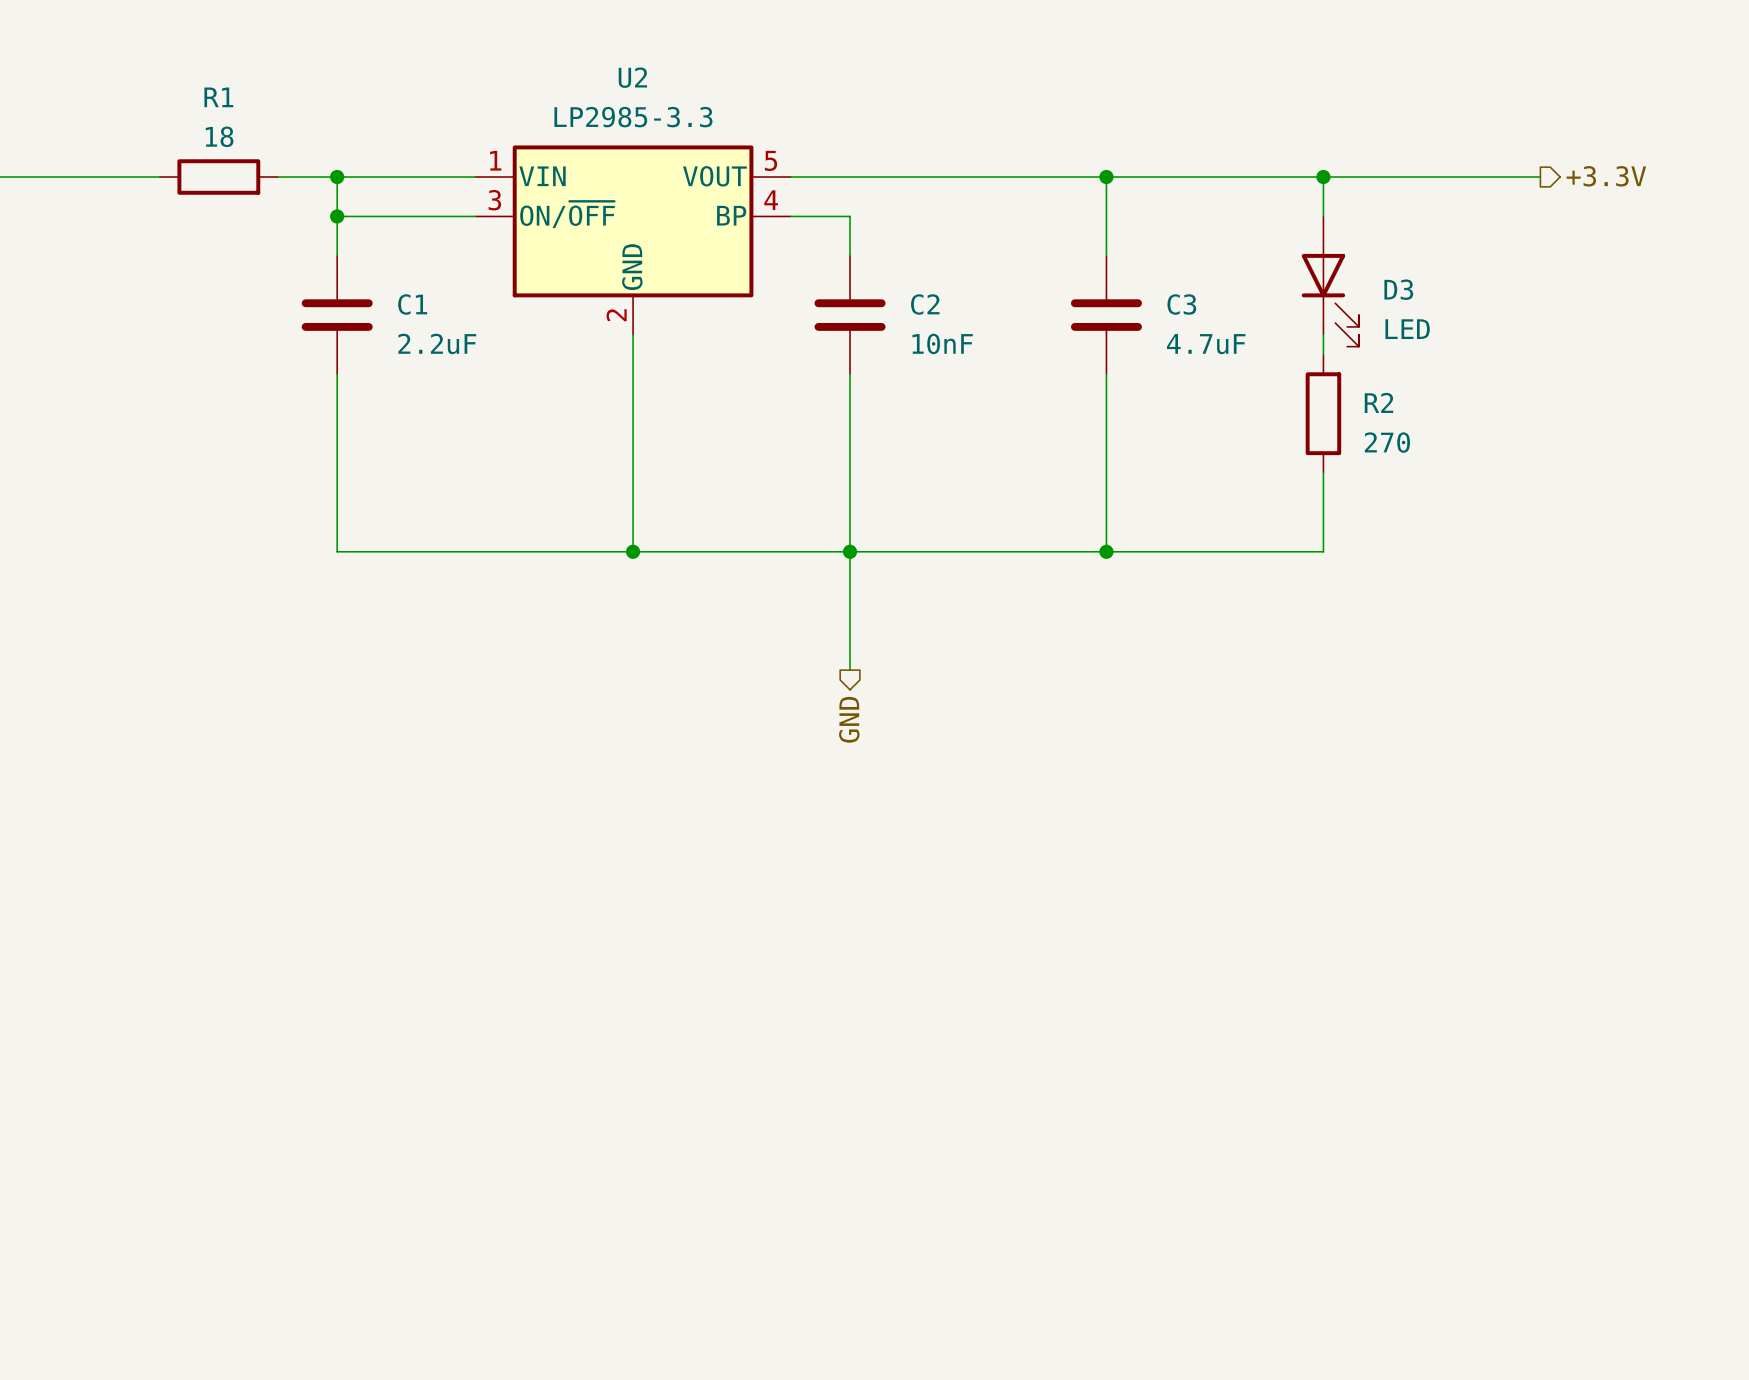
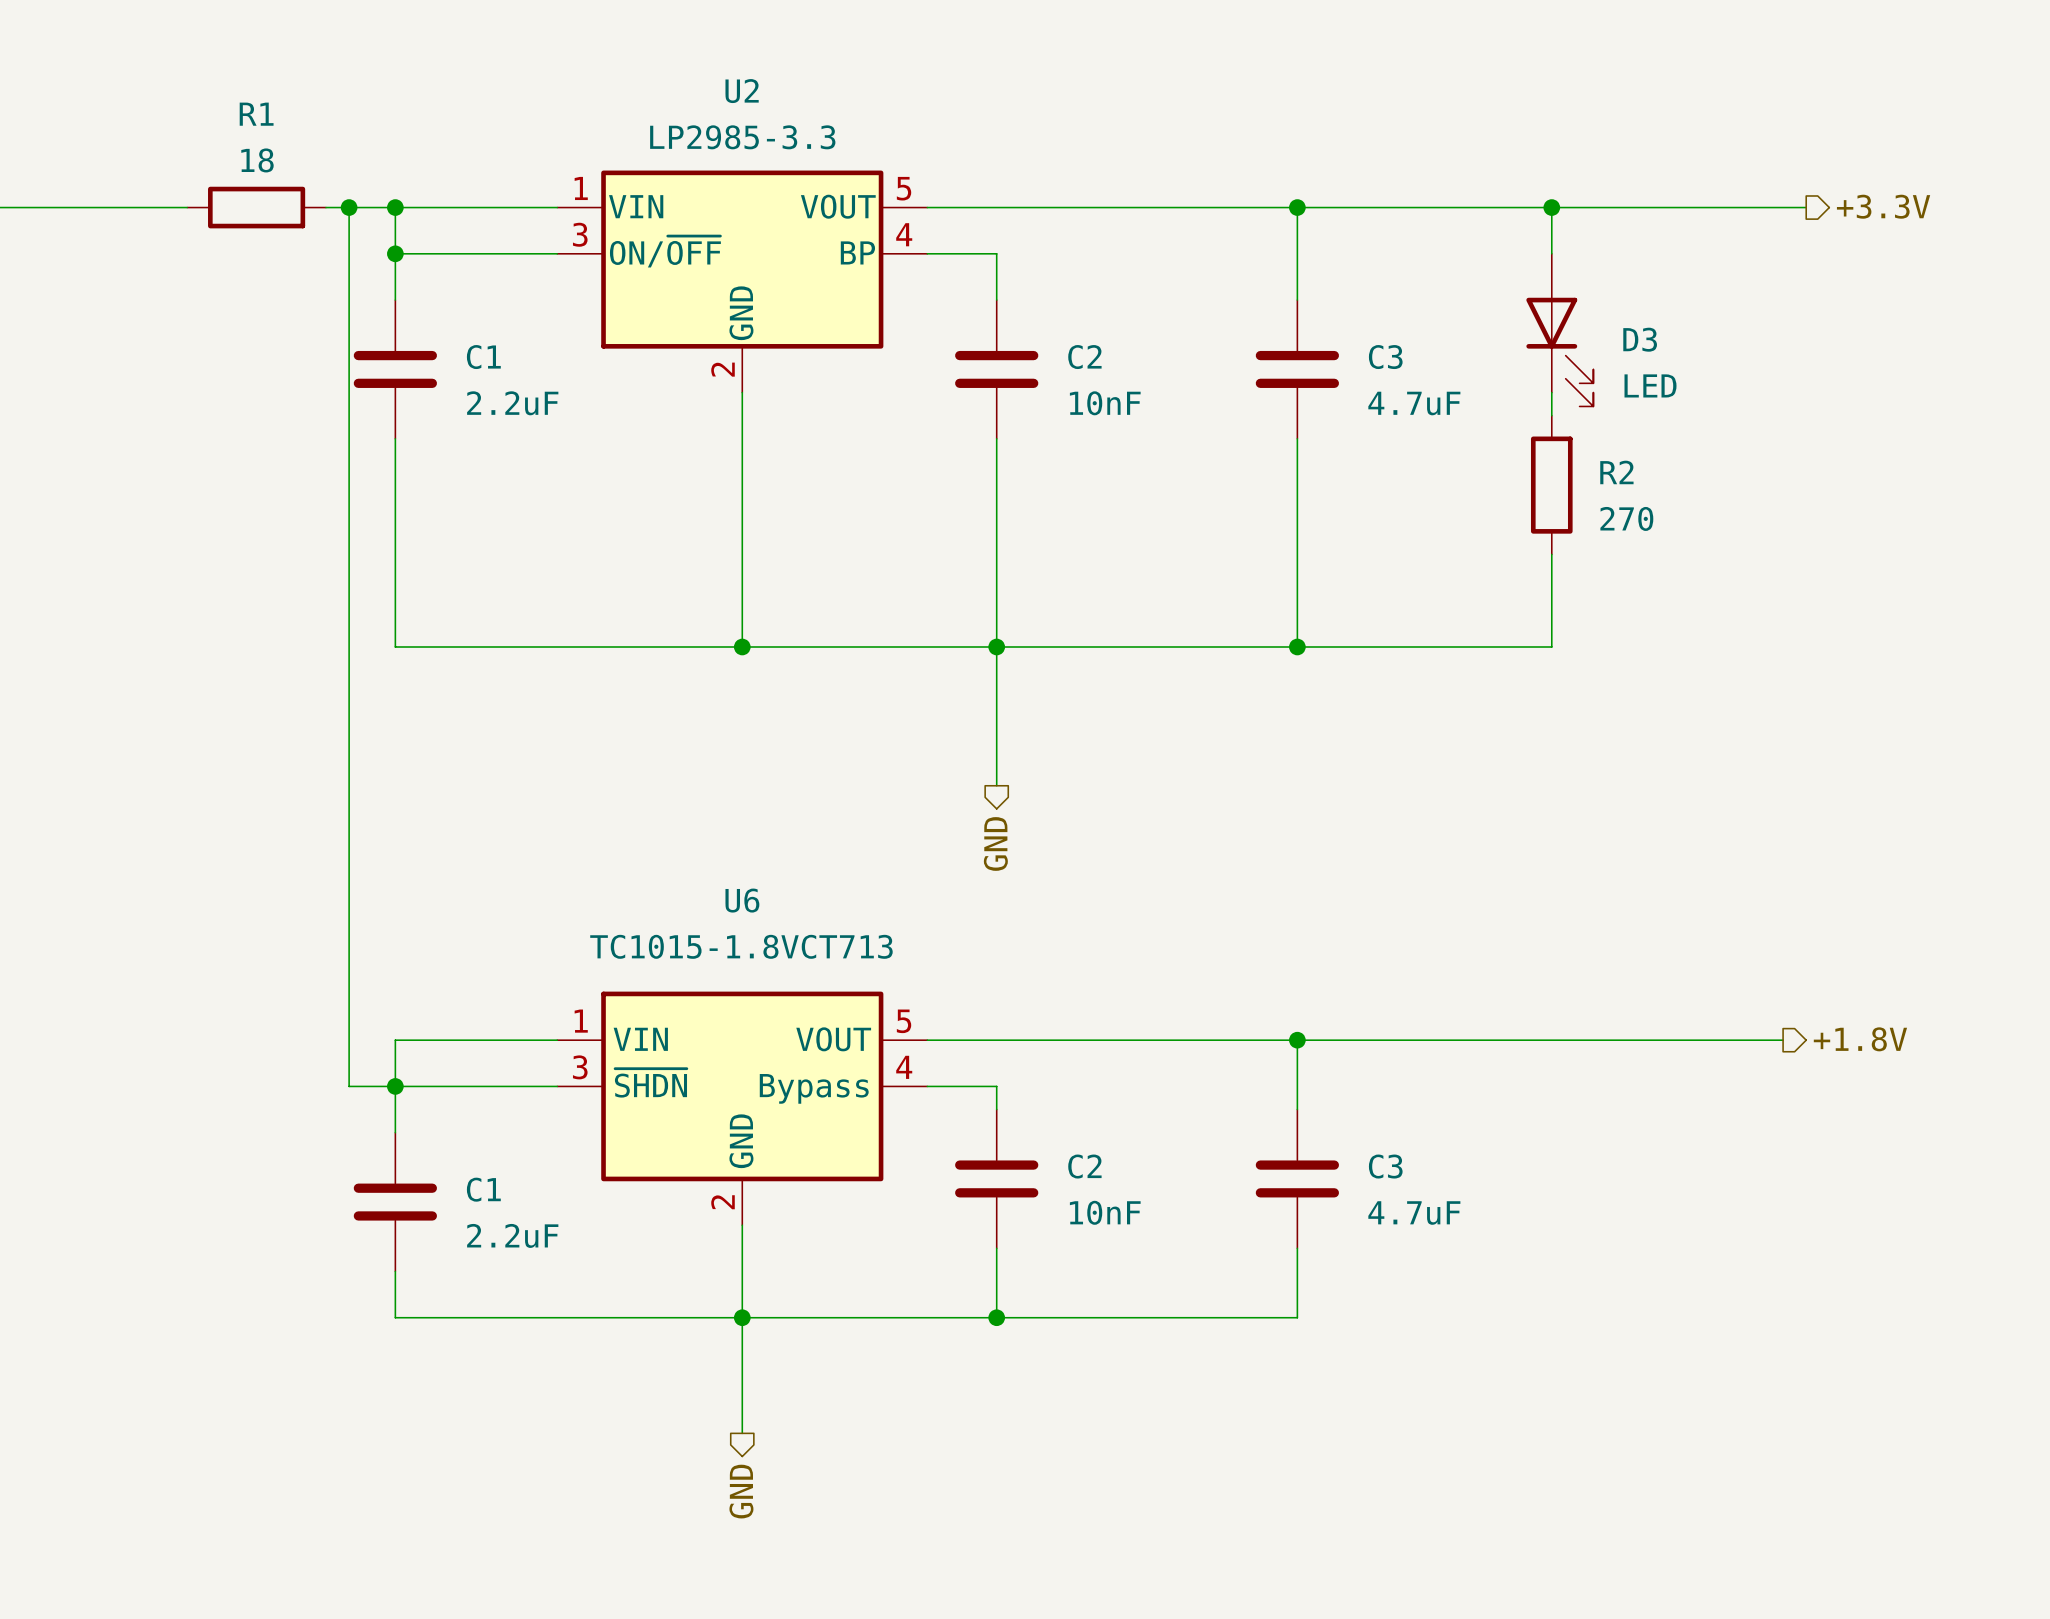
wire: none -> (349, 207) (349, 1086) (557, 1086)
junction: none -> (349, 207)
hierarchical label: none -> +1.8V (1860, 1039)
wire: none -> (557, 1040) (395, 1040) (395, 1132)
wire: none -> (927, 1040) (1783, 1040)
wire: none -> (1297, 1040) (1297, 1109)
junction: none -> (1297, 1040)
junction: none -> (395, 1086)
wire: none -> (927, 1086) (996, 1086) (996, 1109)
U6: none -> TC1015-1.8VCT713 (742, 1108)
C2: none -> 10nF (996, 1178)
C3: none -> 4.7uF (1297, 1178)
C1: none -> 2.2uF (395, 1202)
wire: none -> (742, 1225) (742, 1433)
wire: none -> (996, 1248) (996, 1317)
wire: none -> (1297, 1248) (1297, 1317) (395, 1317) (395, 1271)
junction: none -> (742, 1317)
junction: none -> (996, 1317)
hierarchical label: none -> GND (741, 1491)

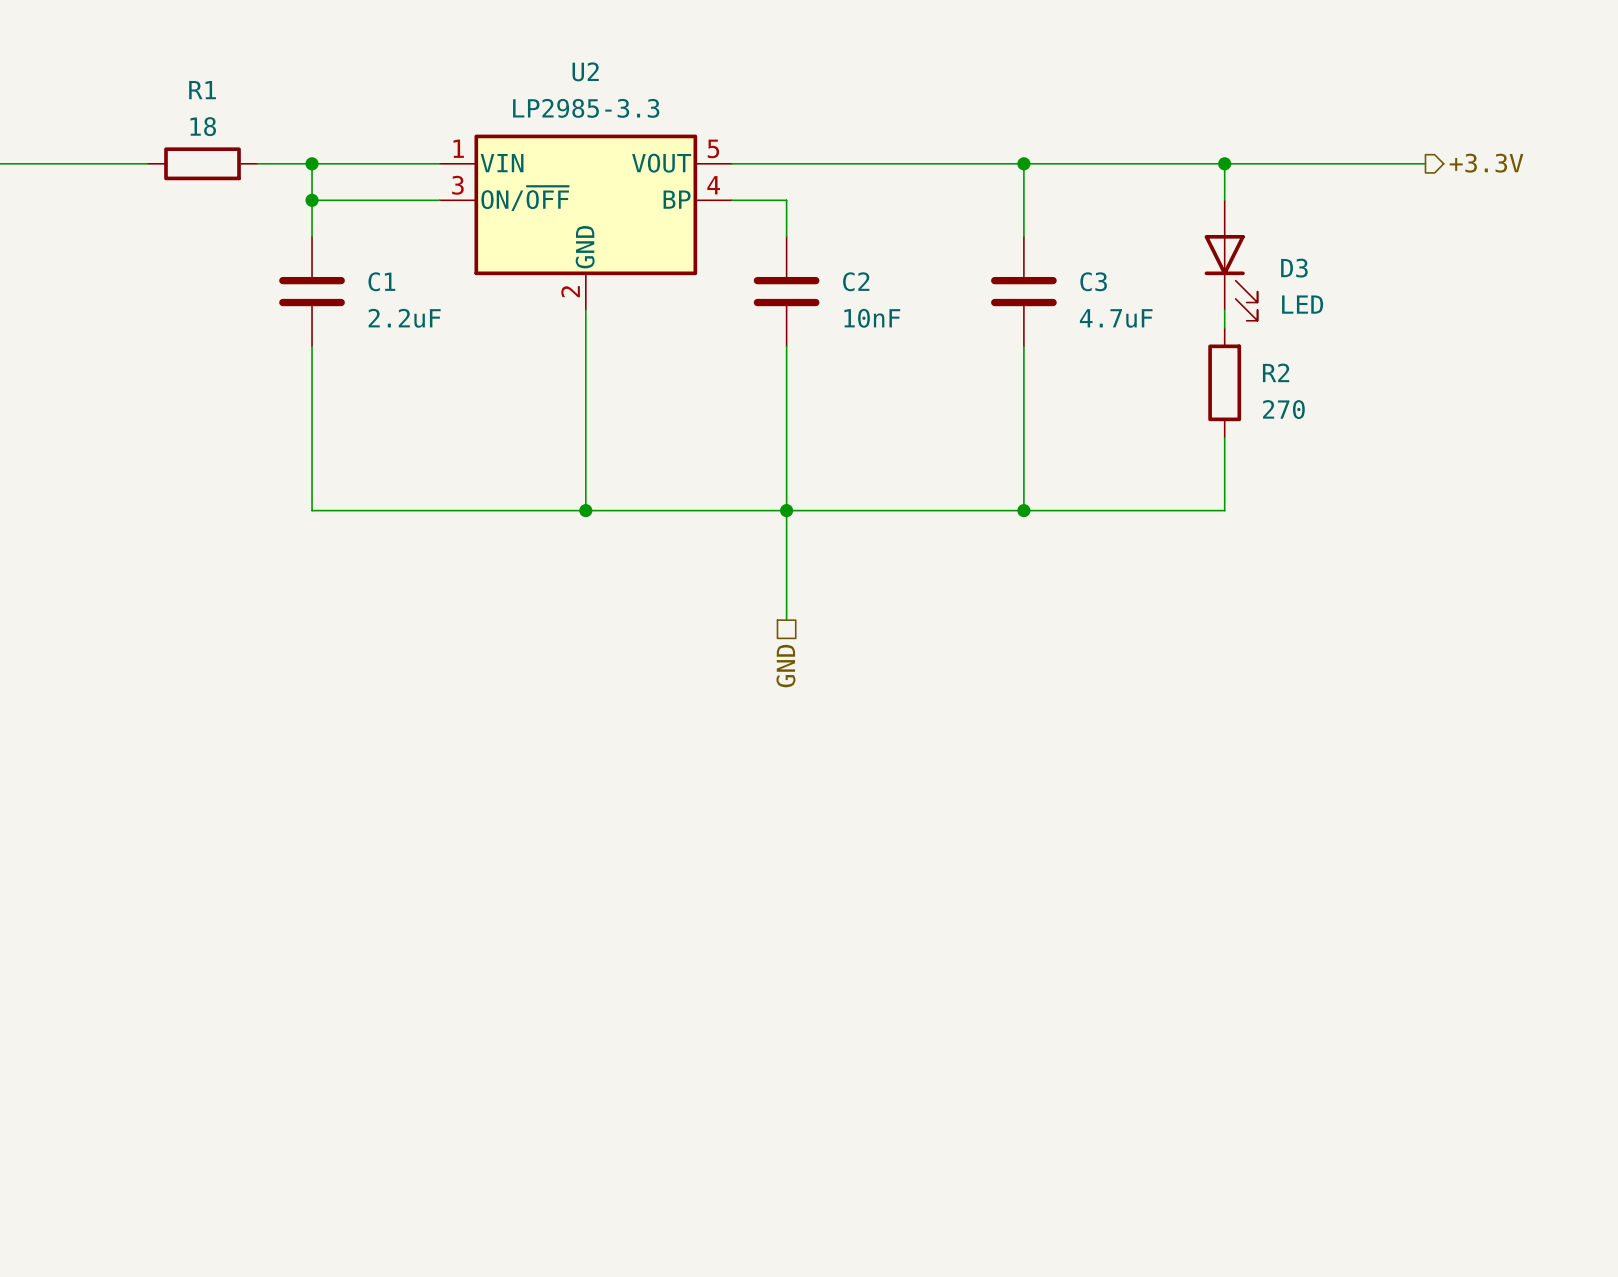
wire: (349, 207) (349, 1086) (557, 1086) -> none
junction: (349, 207) -> none
hierarchical label shape: output (995, 843) -> passive (785, 666)
hierarchical label: +1.8V (1860, 1039) -> none
wire: (557, 1040) (395, 1040) (395, 1132) -> none
wire: (927, 1040) (1783, 1040) -> none
wire: (1297, 1040) (1297, 1109) -> none
junction: (1297, 1040) -> none
junction: (395, 1086) -> none
wire: (927, 1086) (996, 1086) (996, 1109) -> none
U6: TC1015-1.8VCT713 (742, 1108) -> none
C2: 10nF (996, 1178) -> none
C3: 4.7uF (1297, 1178) -> none
C1: 2.2uF (395, 1202) -> none
wire: (742, 1225) (742, 1433) -> none
wire: (996, 1248) (996, 1317) -> none
wire: (1297, 1248) (1297, 1317) (395, 1317) (395, 1271) -> none
junction: (742, 1317) -> none
junction: (996, 1317) -> none
hierarchical label: GND (741, 1491) -> none

